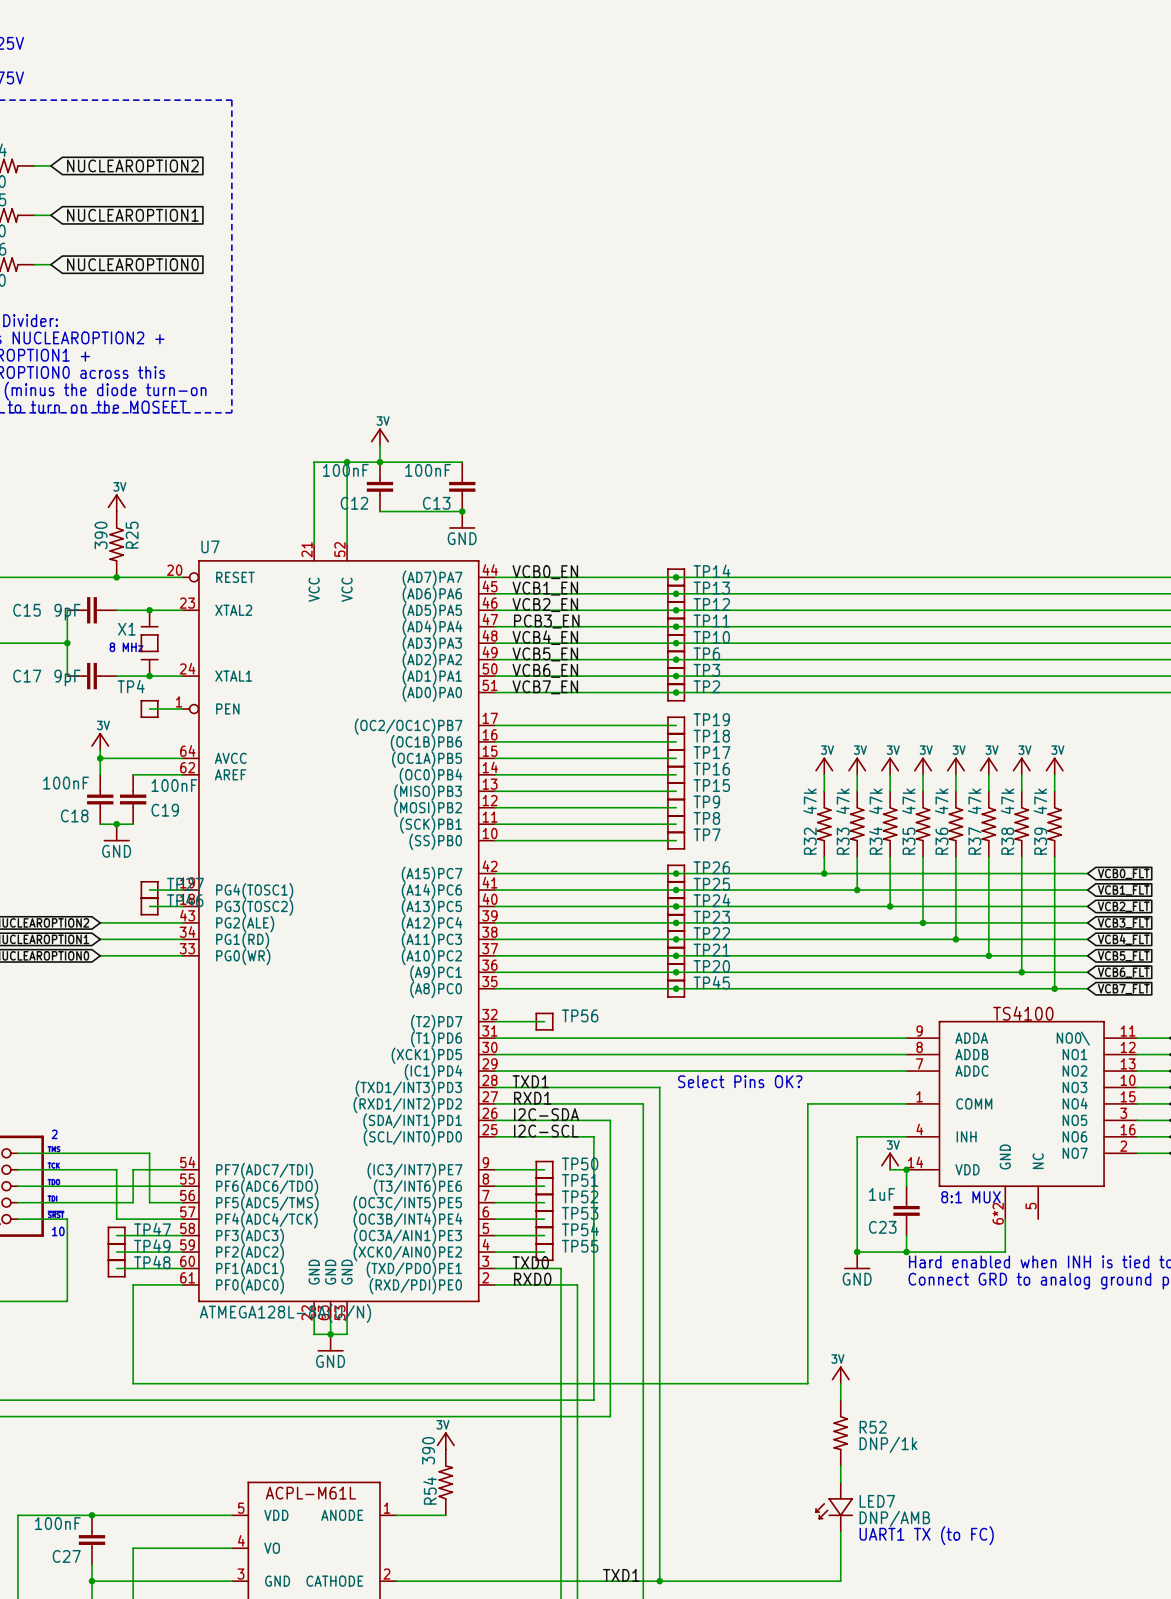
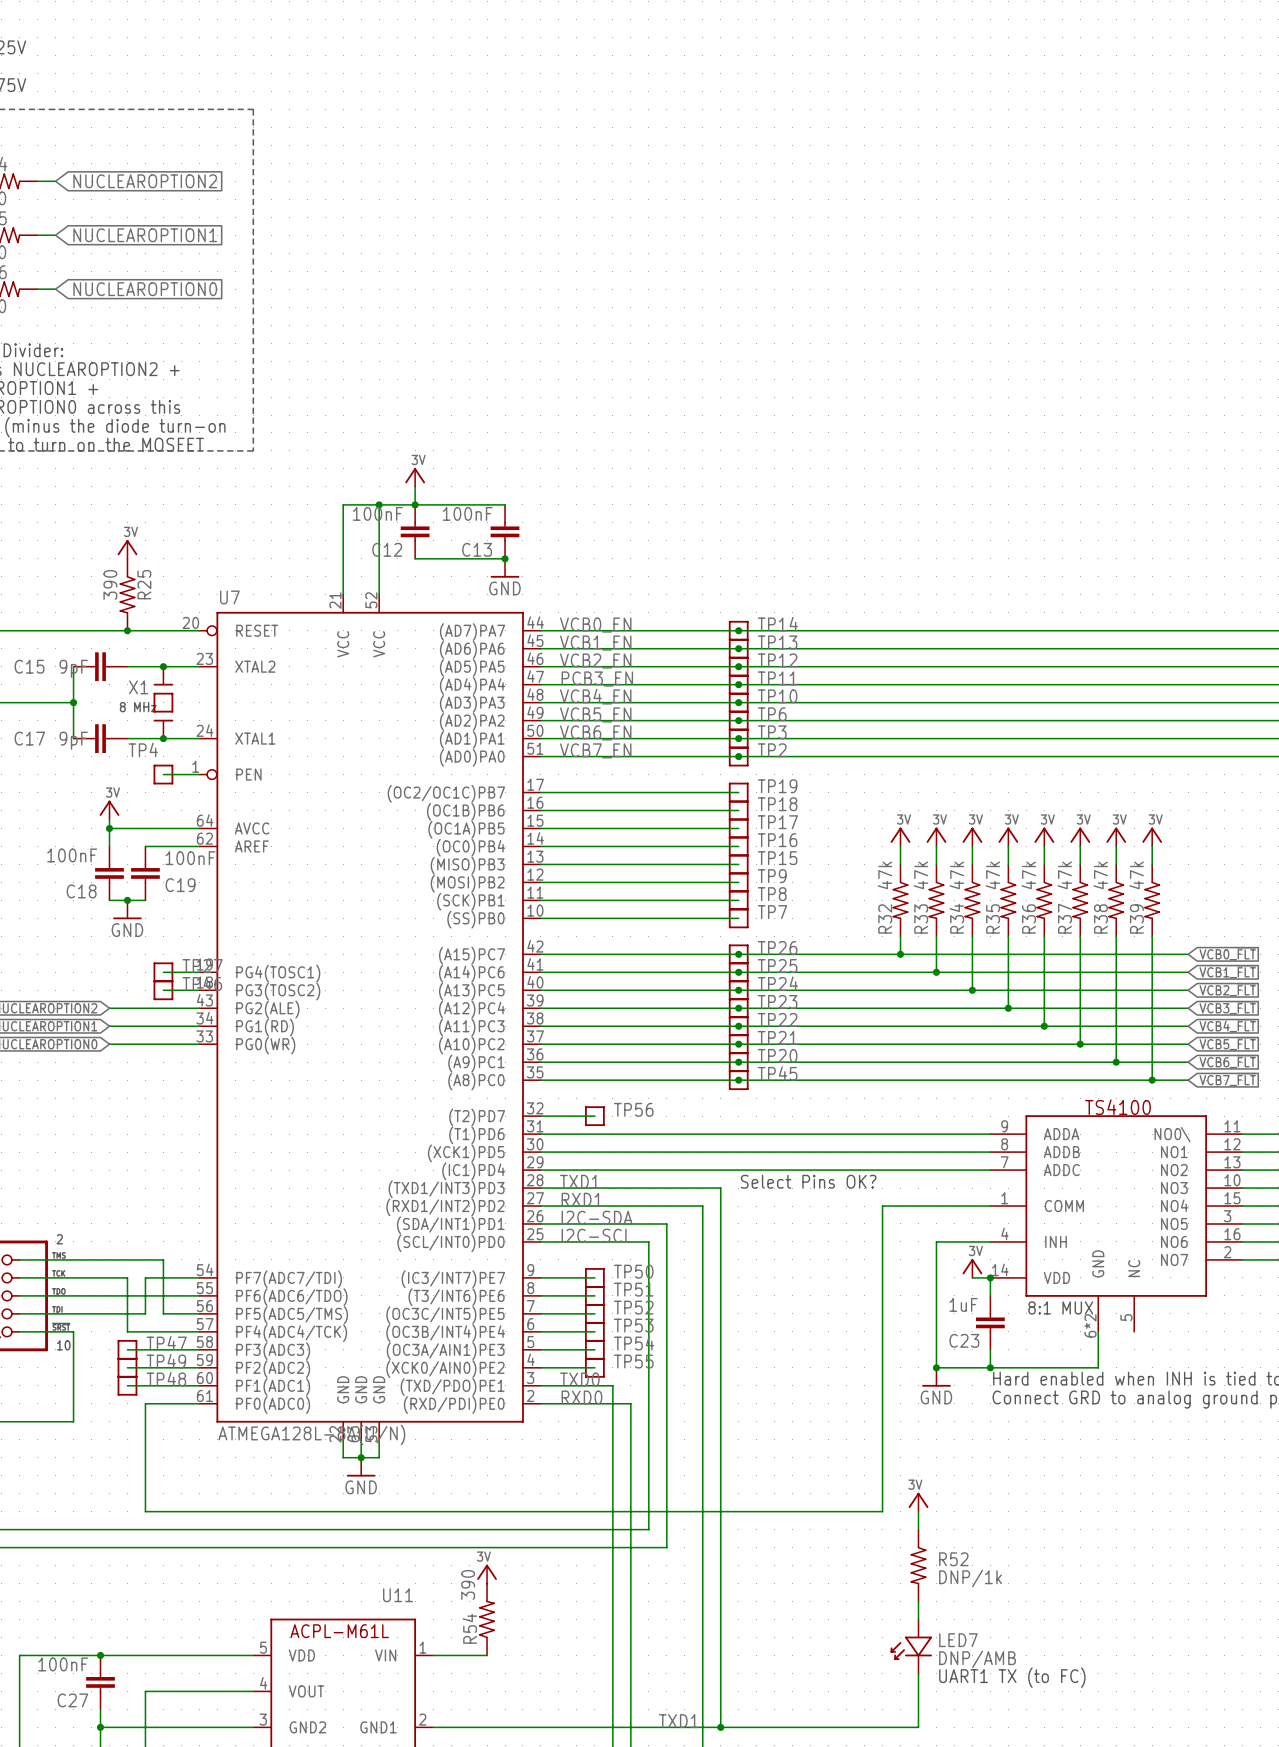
U11 name: none -> U11 (398, 1595)
U11 pin name: ANODE (342, 1515) -> VIN (385, 1655)
U11 pin name: VO (272, 1548) -> VOUT (306, 1691)
U11 pin name: GND (277, 1581) -> GND2 (307, 1727)
U11 pin name: CATHODE (334, 1581) -> GND1 (378, 1727)

